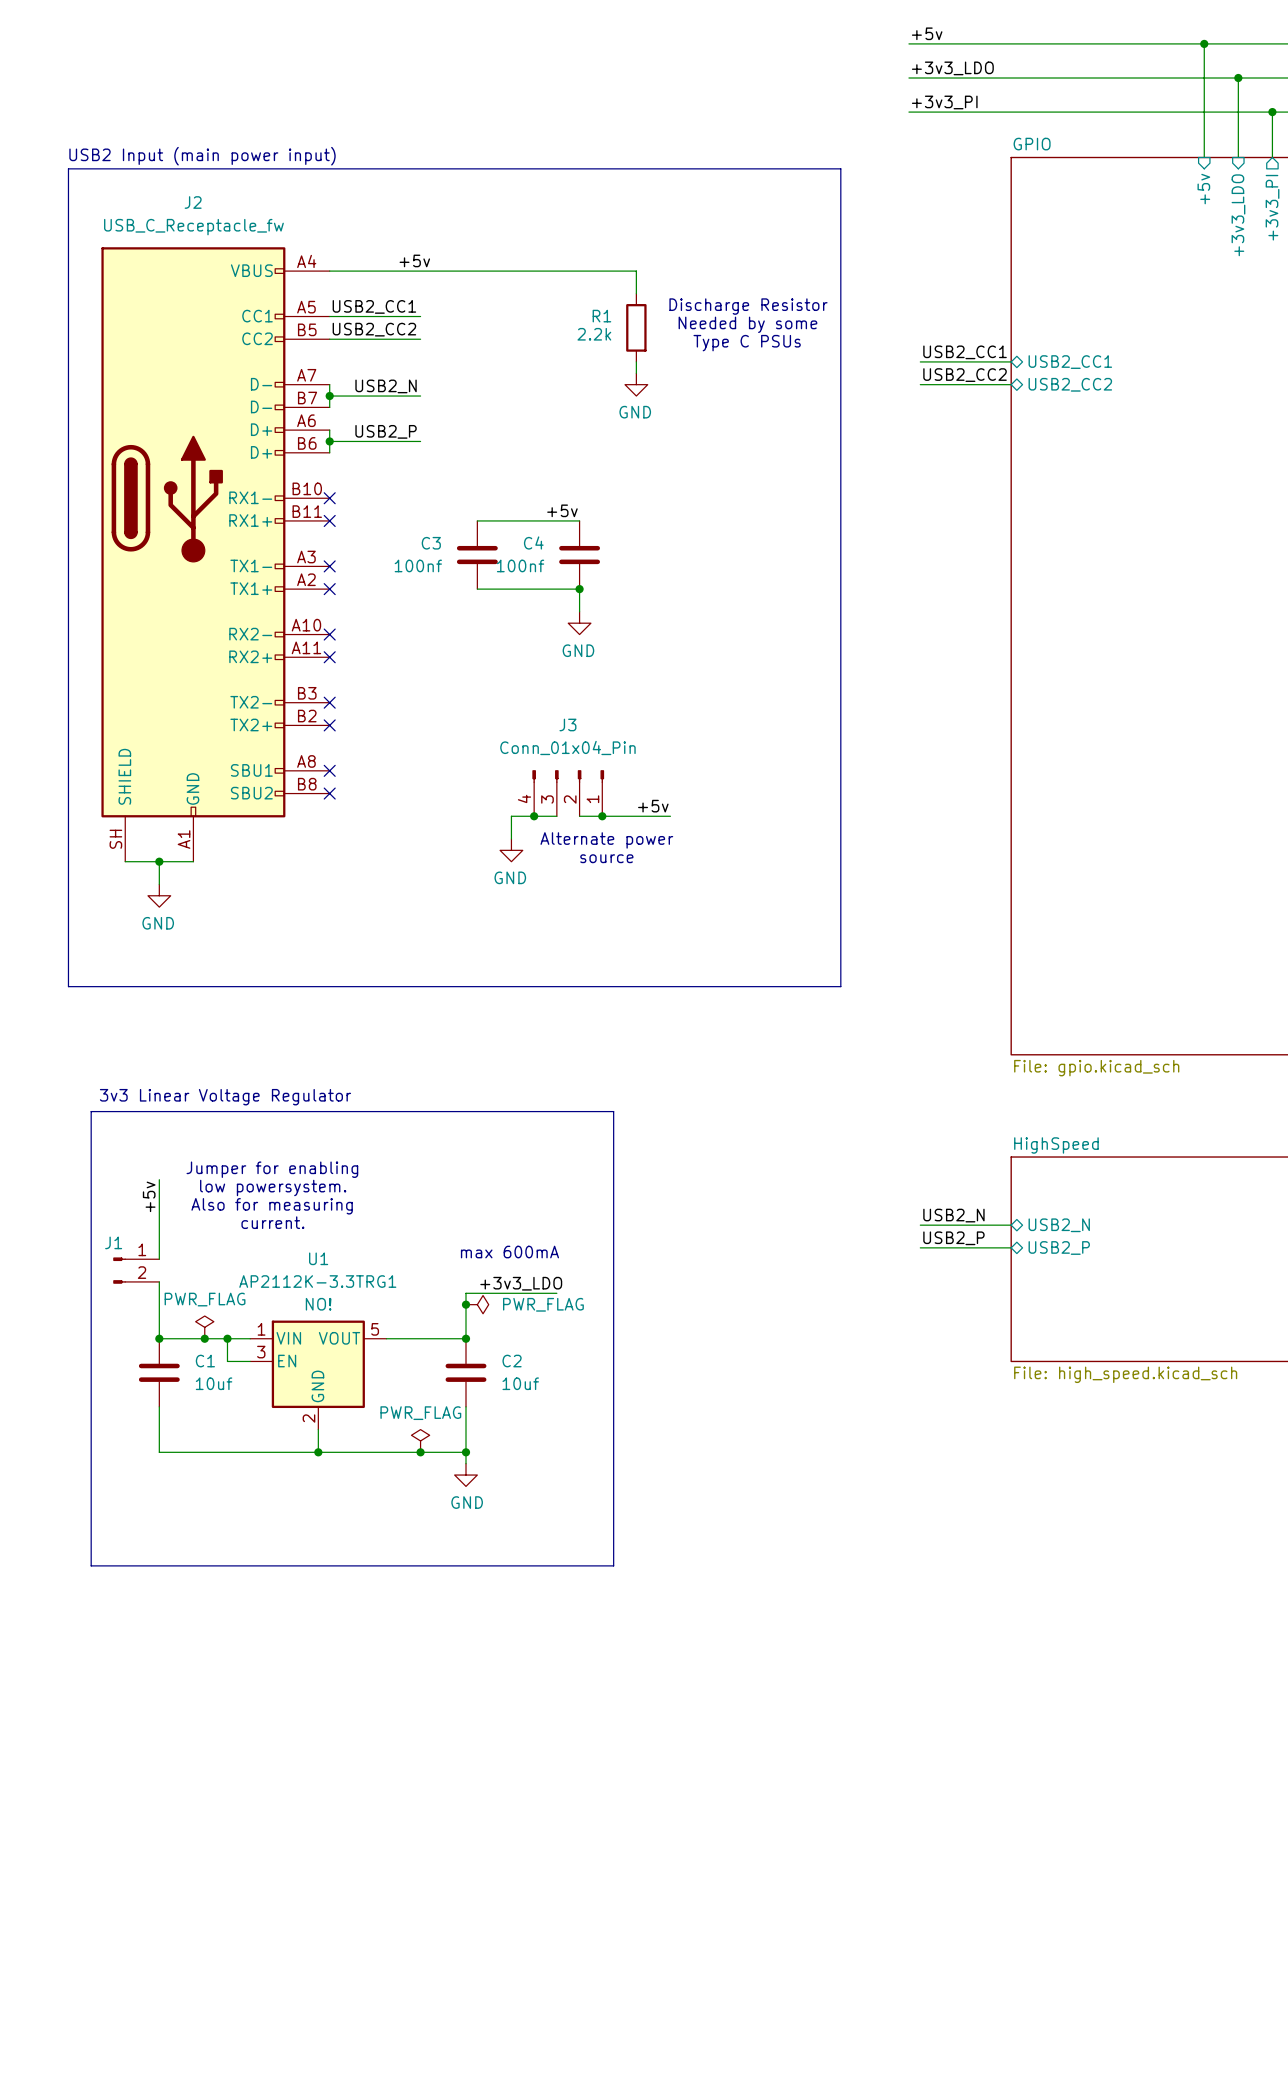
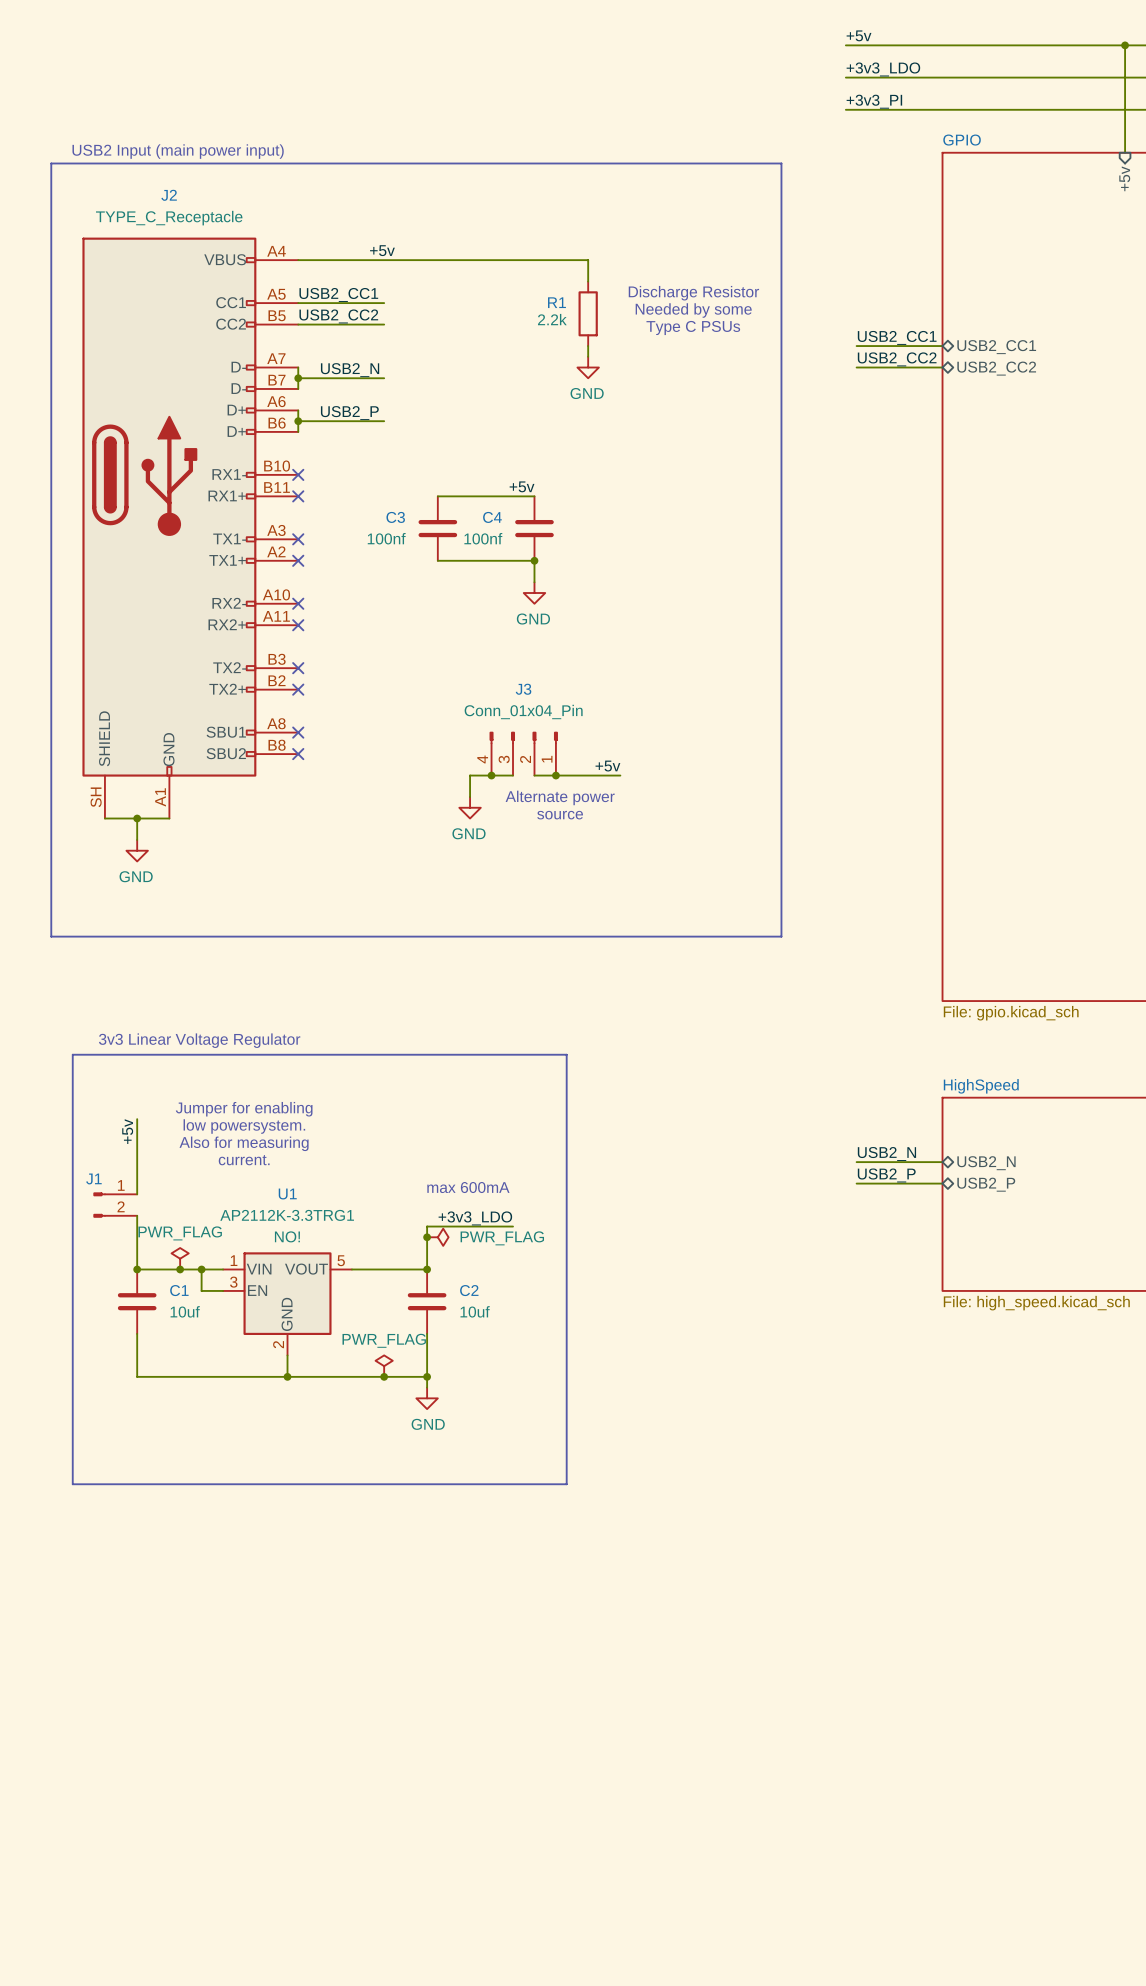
J2 value: USB_C_Receptacle_fw (193, 227) -> TYPE_C_Receptacle (169, 218)

